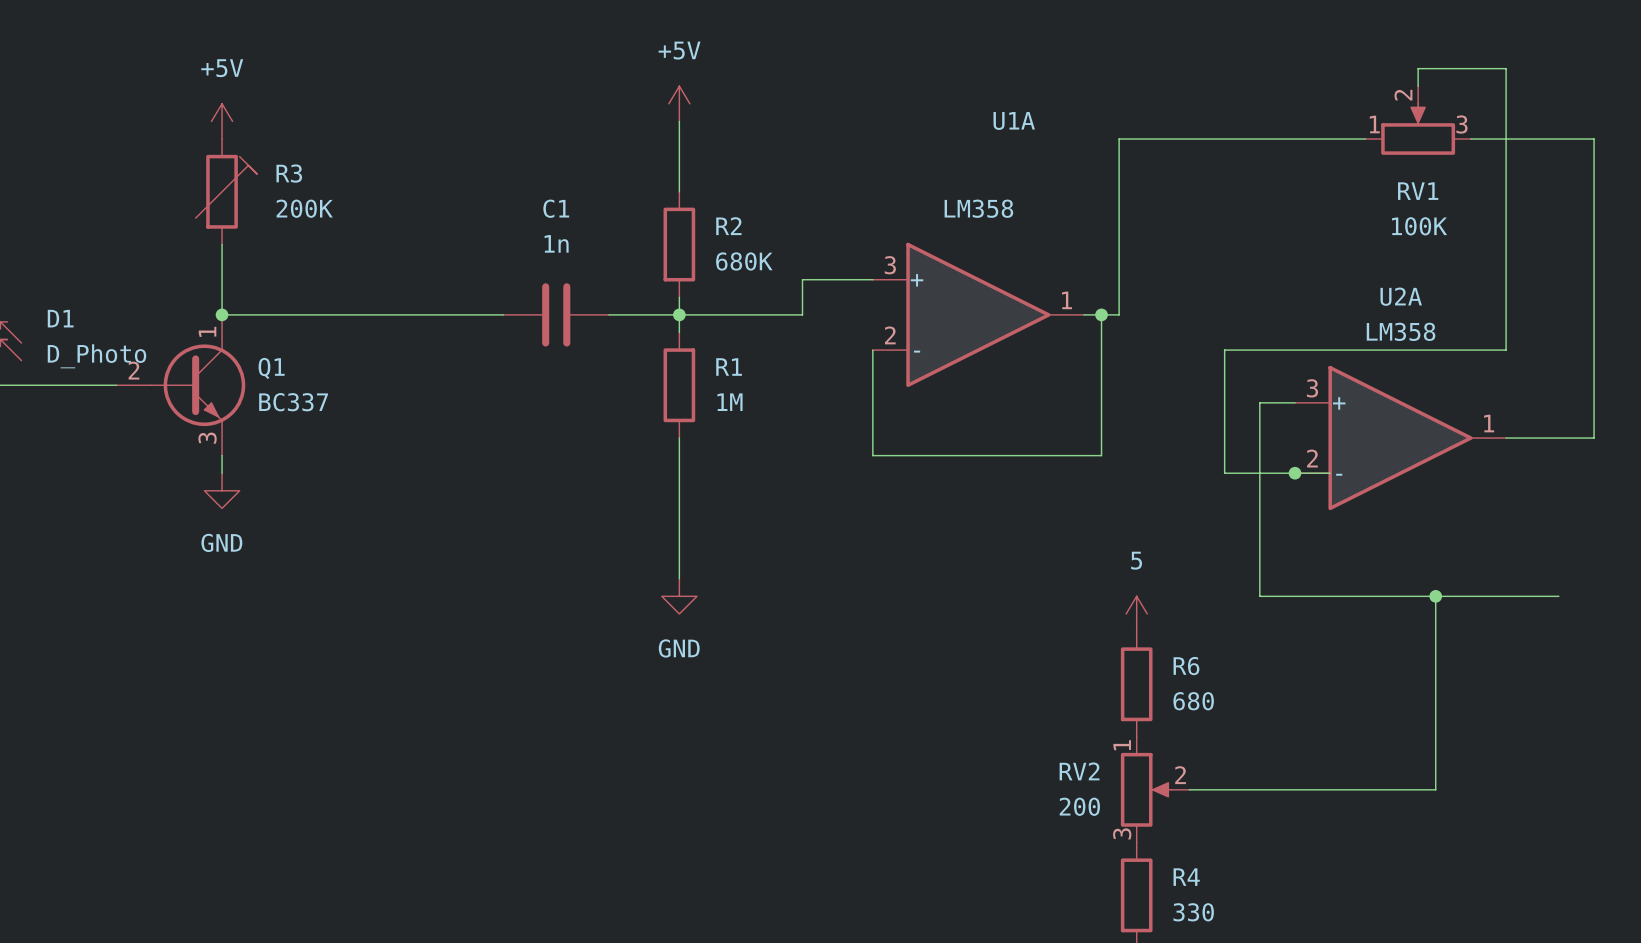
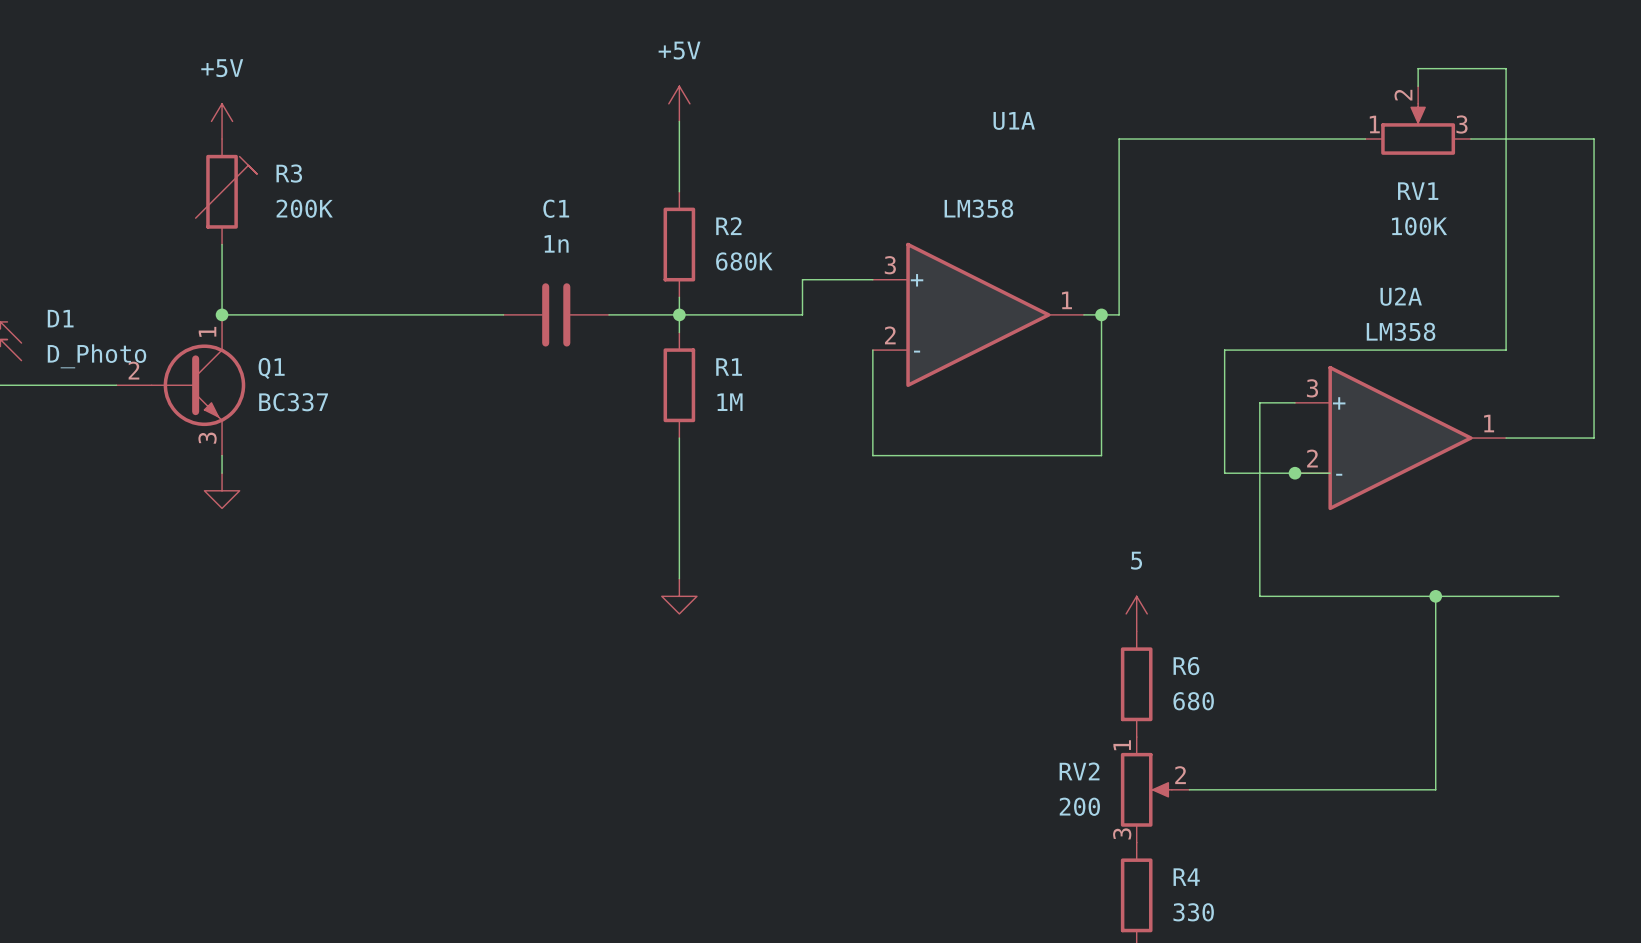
power symbol text: GND (221, 542) -> none
power symbol text: GND (679, 648) -> none

